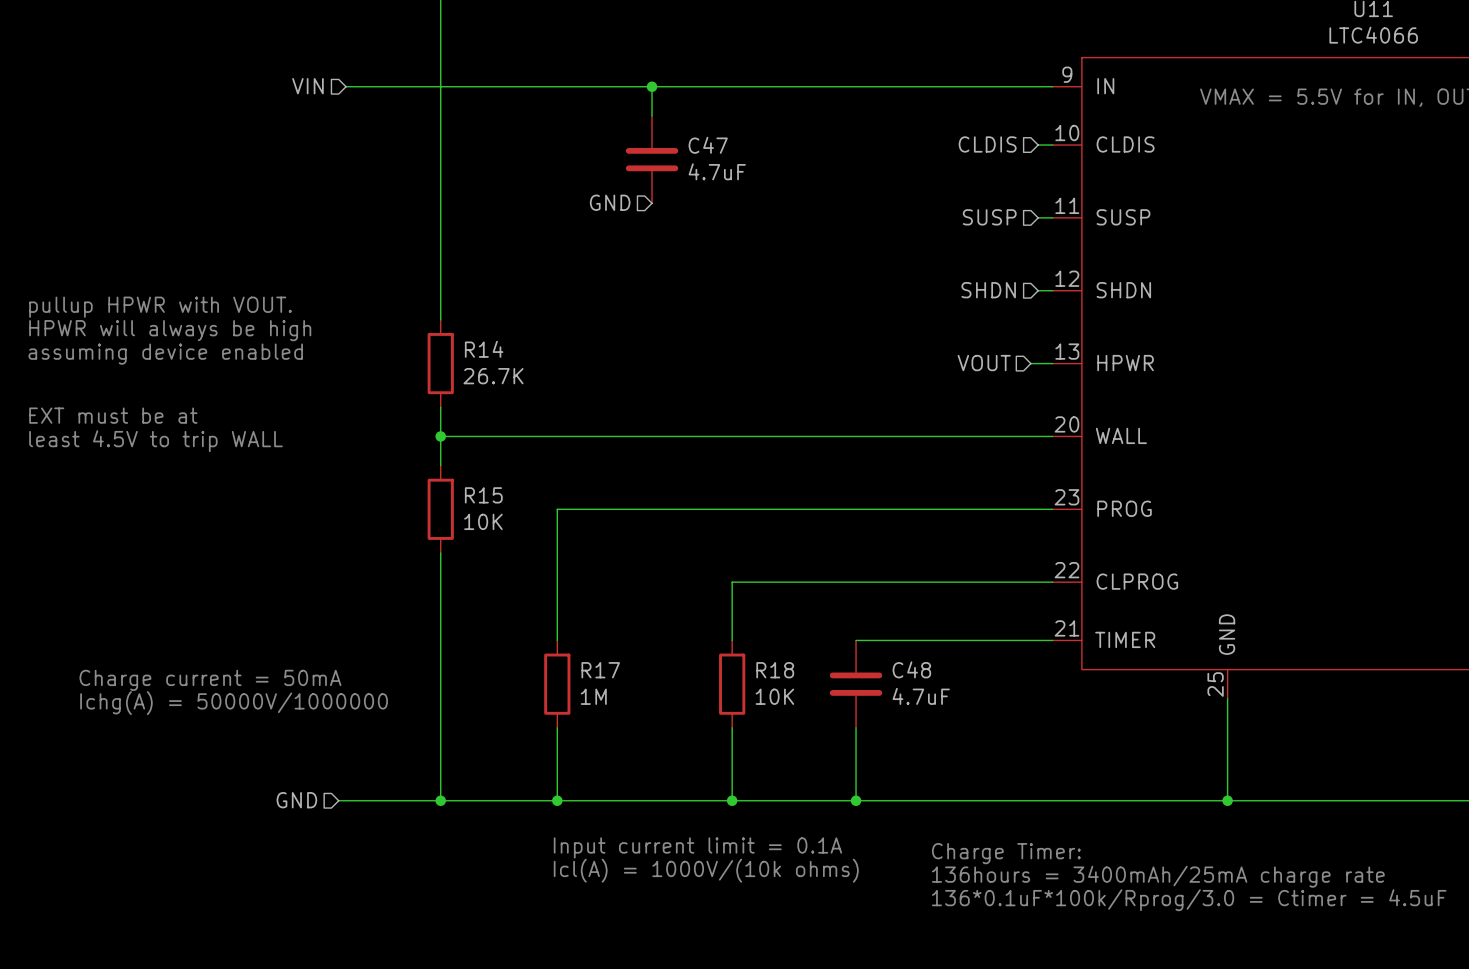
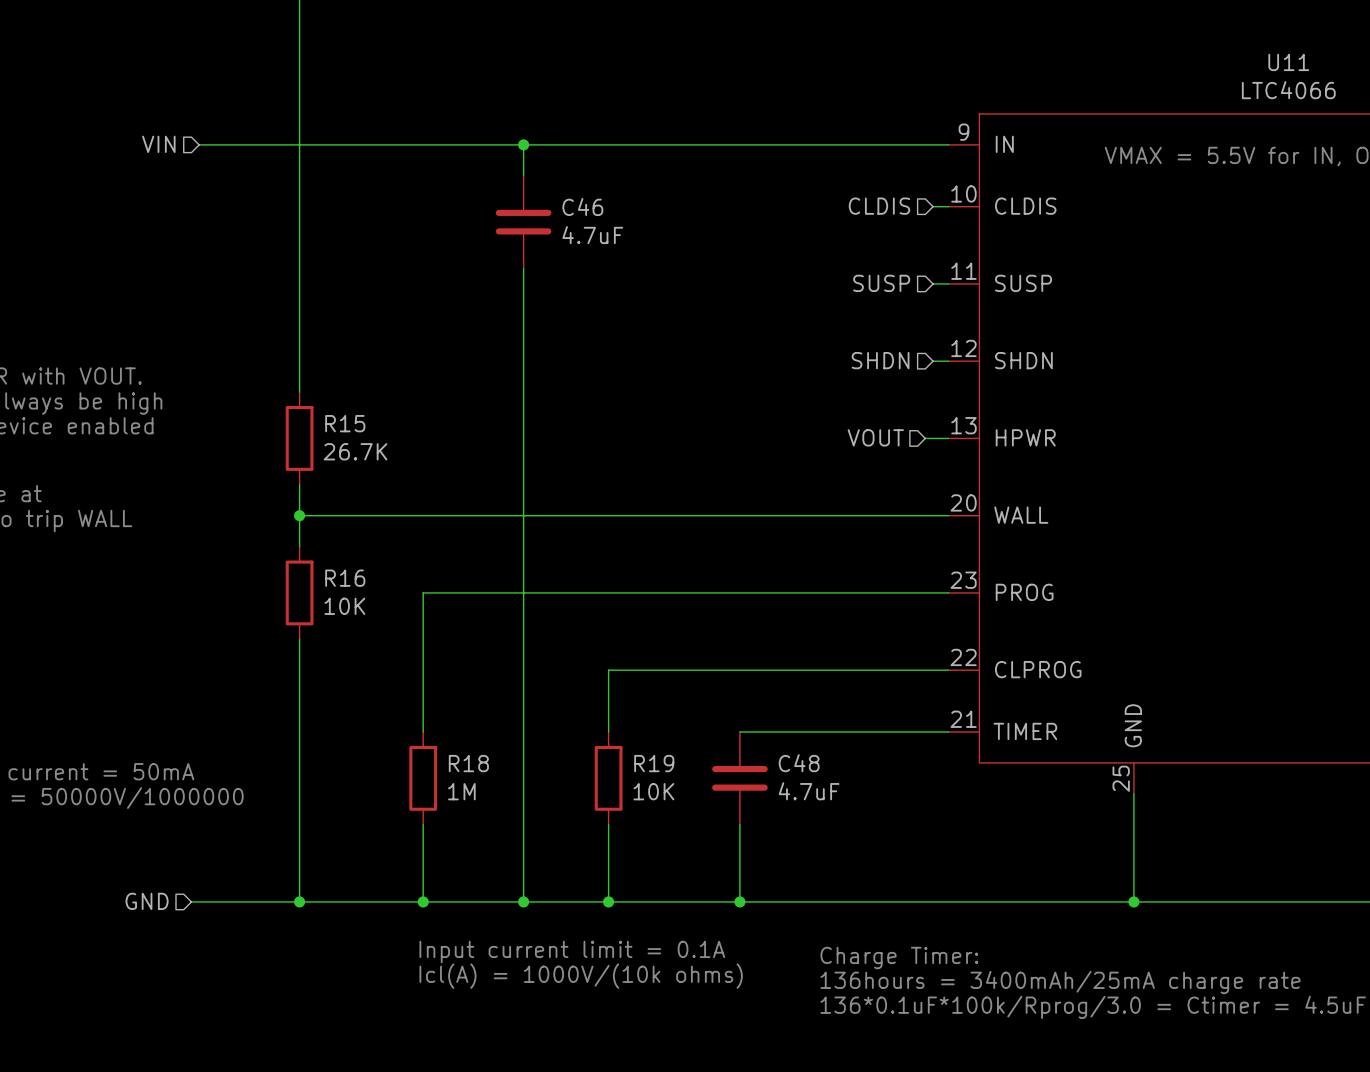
C47 name: C47 (708, 145) -> C46 (582, 206)
hierarchical label: GND (610, 202) -> none
wire: none -> (523, 268) (523, 901)
R14 name: R14 (484, 349) -> R15 (345, 423)
R15 name: R15 (483, 495) -> R16 (345, 578)
R17 name: R17 (600, 670) -> R18 (468, 763)
R18 name: R18 (775, 670) -> R19 (654, 763)
junction: none -> (523, 901)

